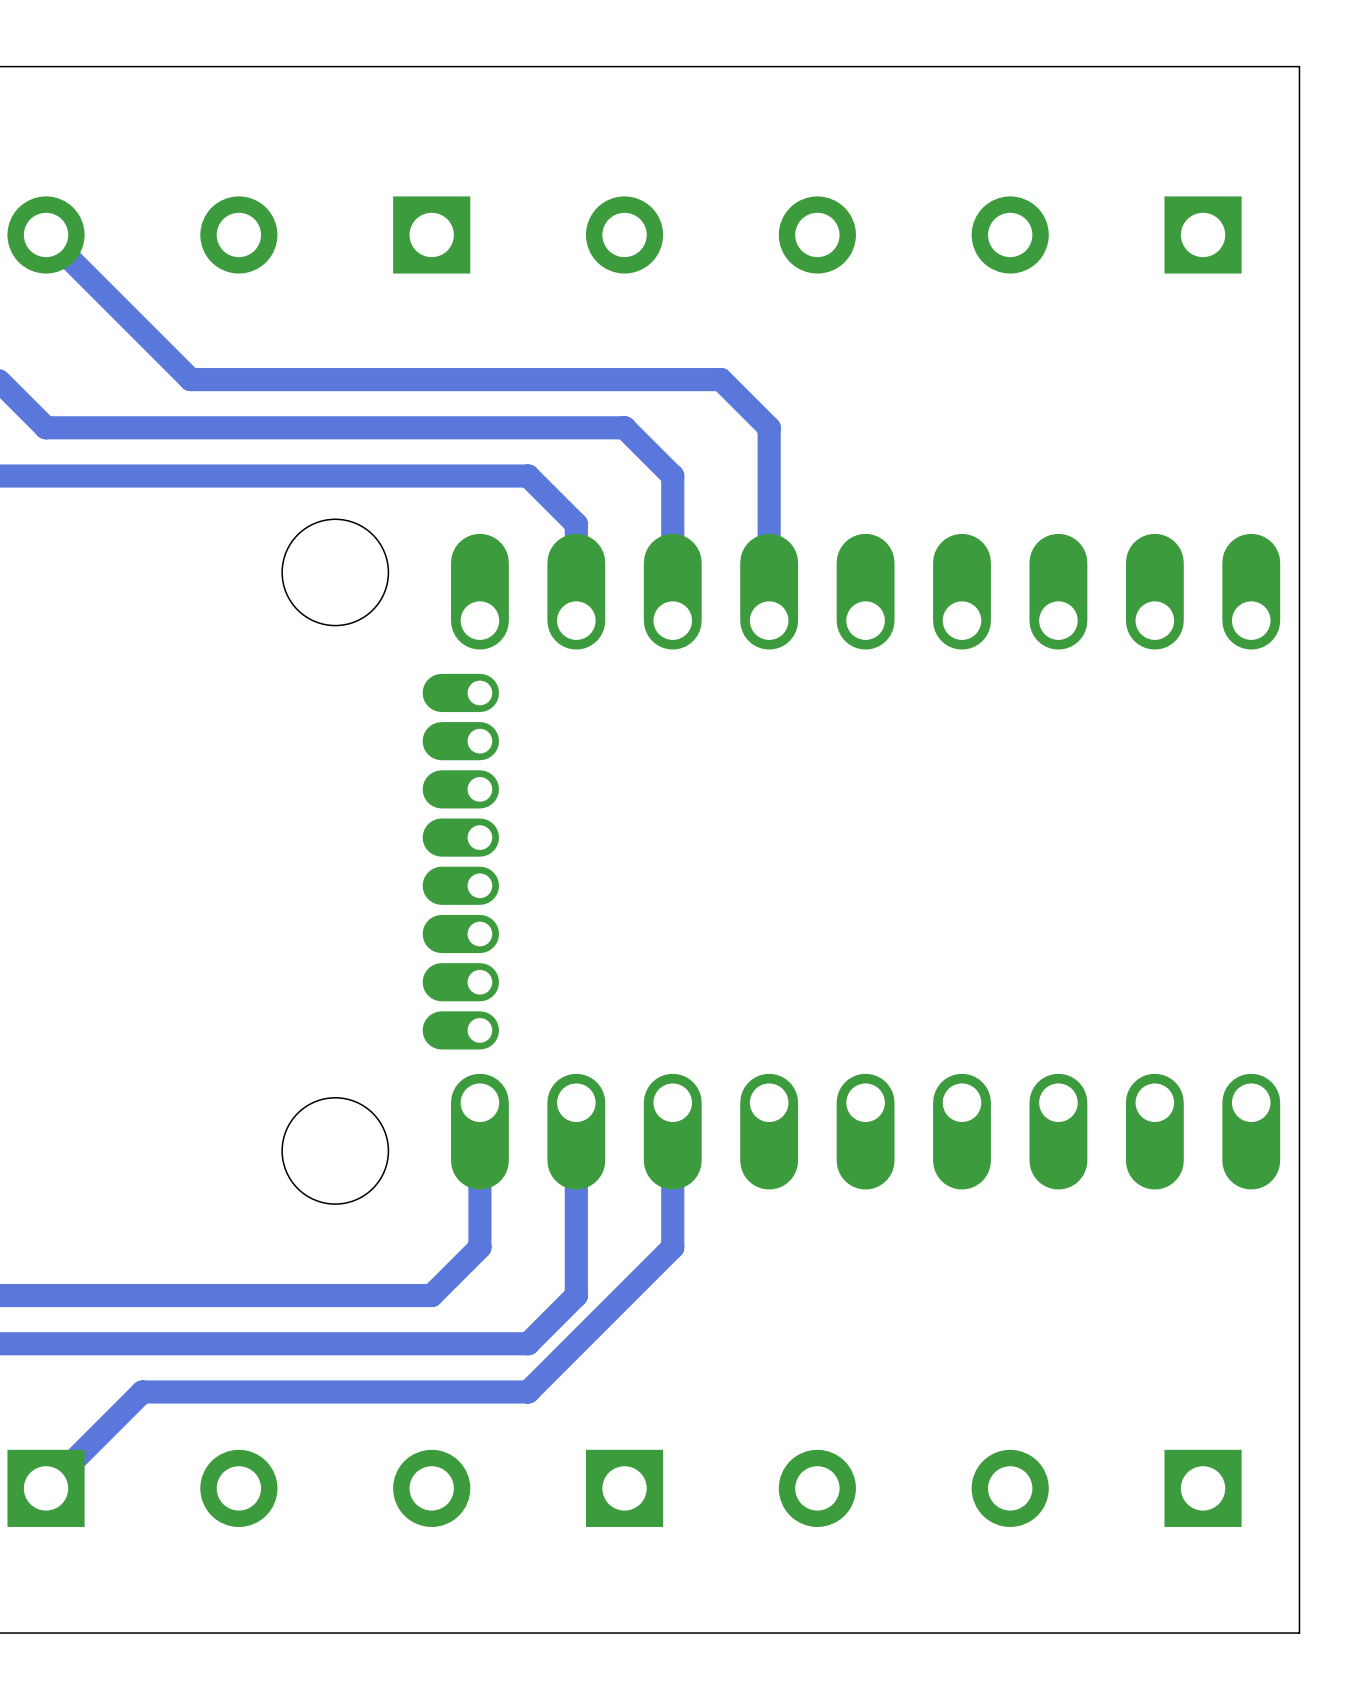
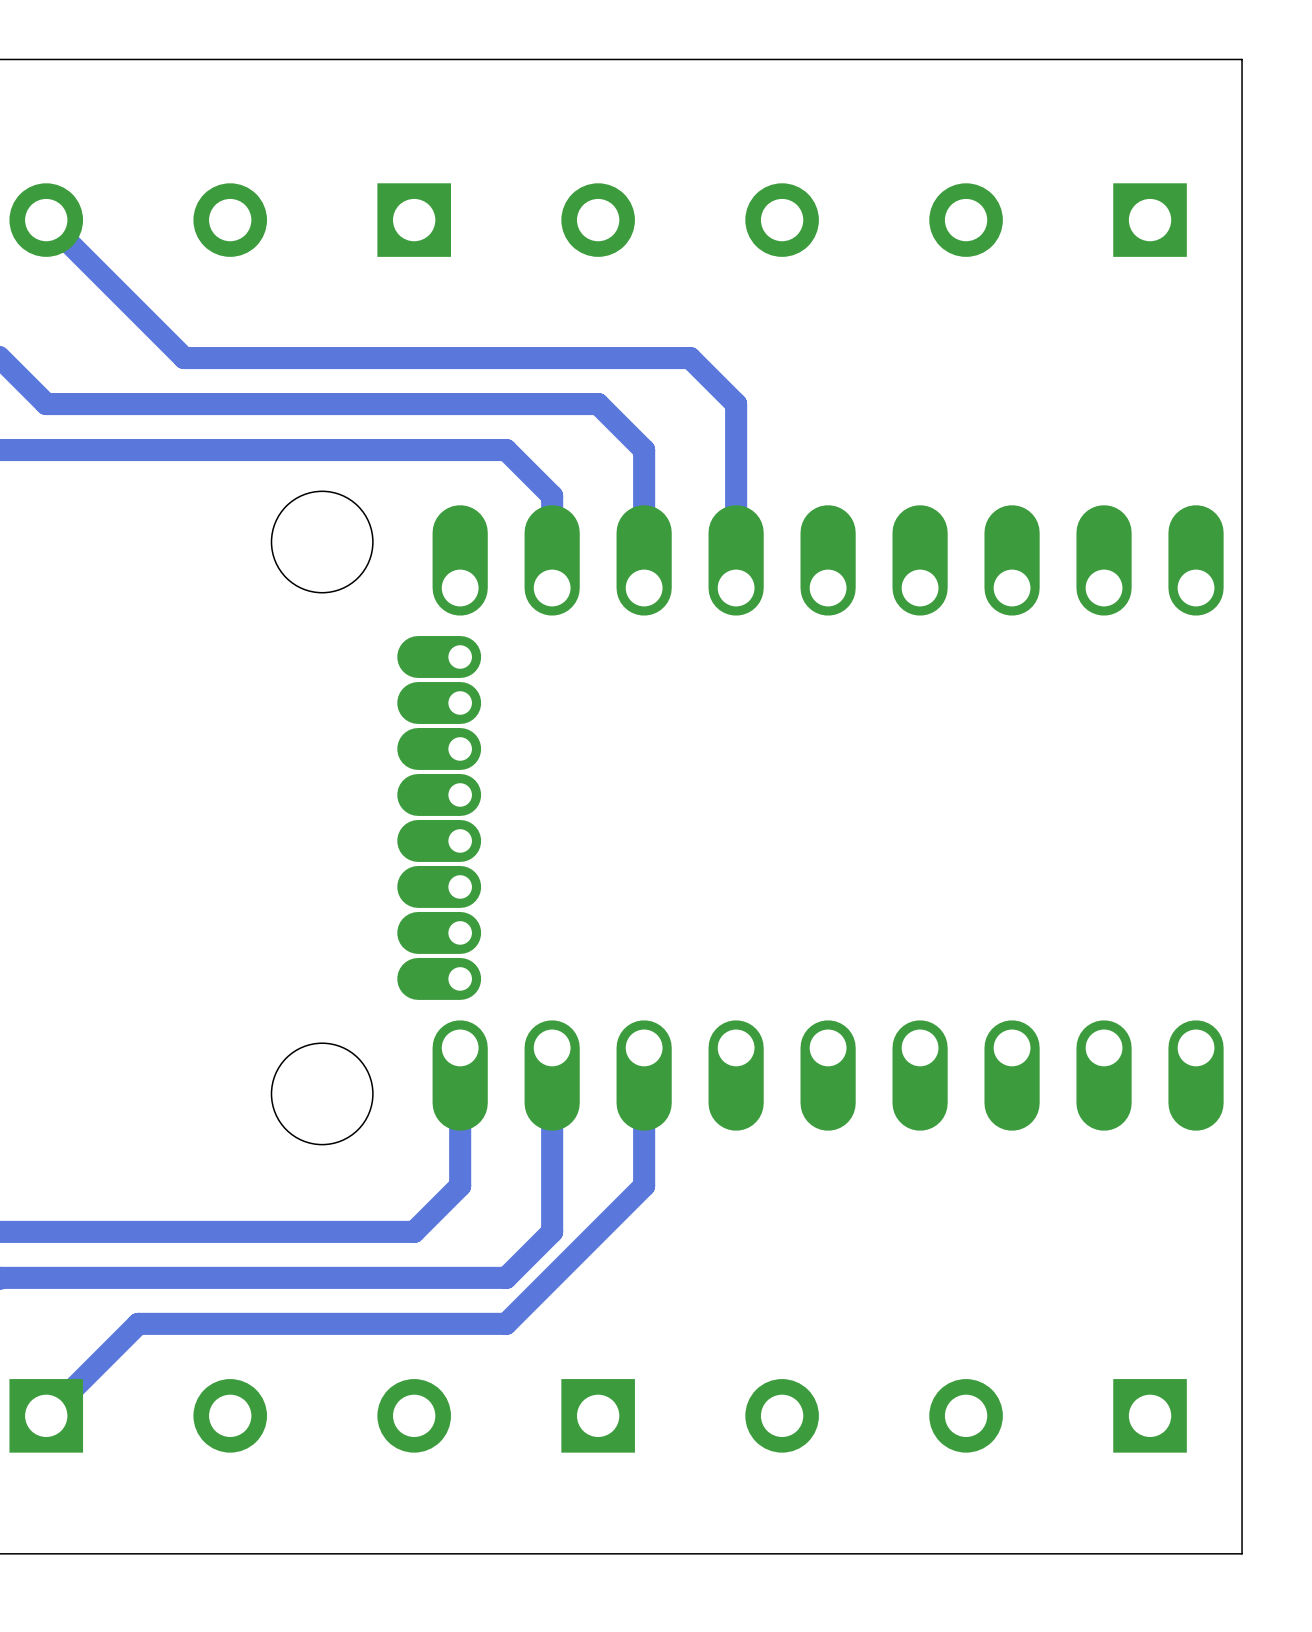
part footprint: [422, 533, 1281, 1190] -> [397, 505, 1224, 1131]

